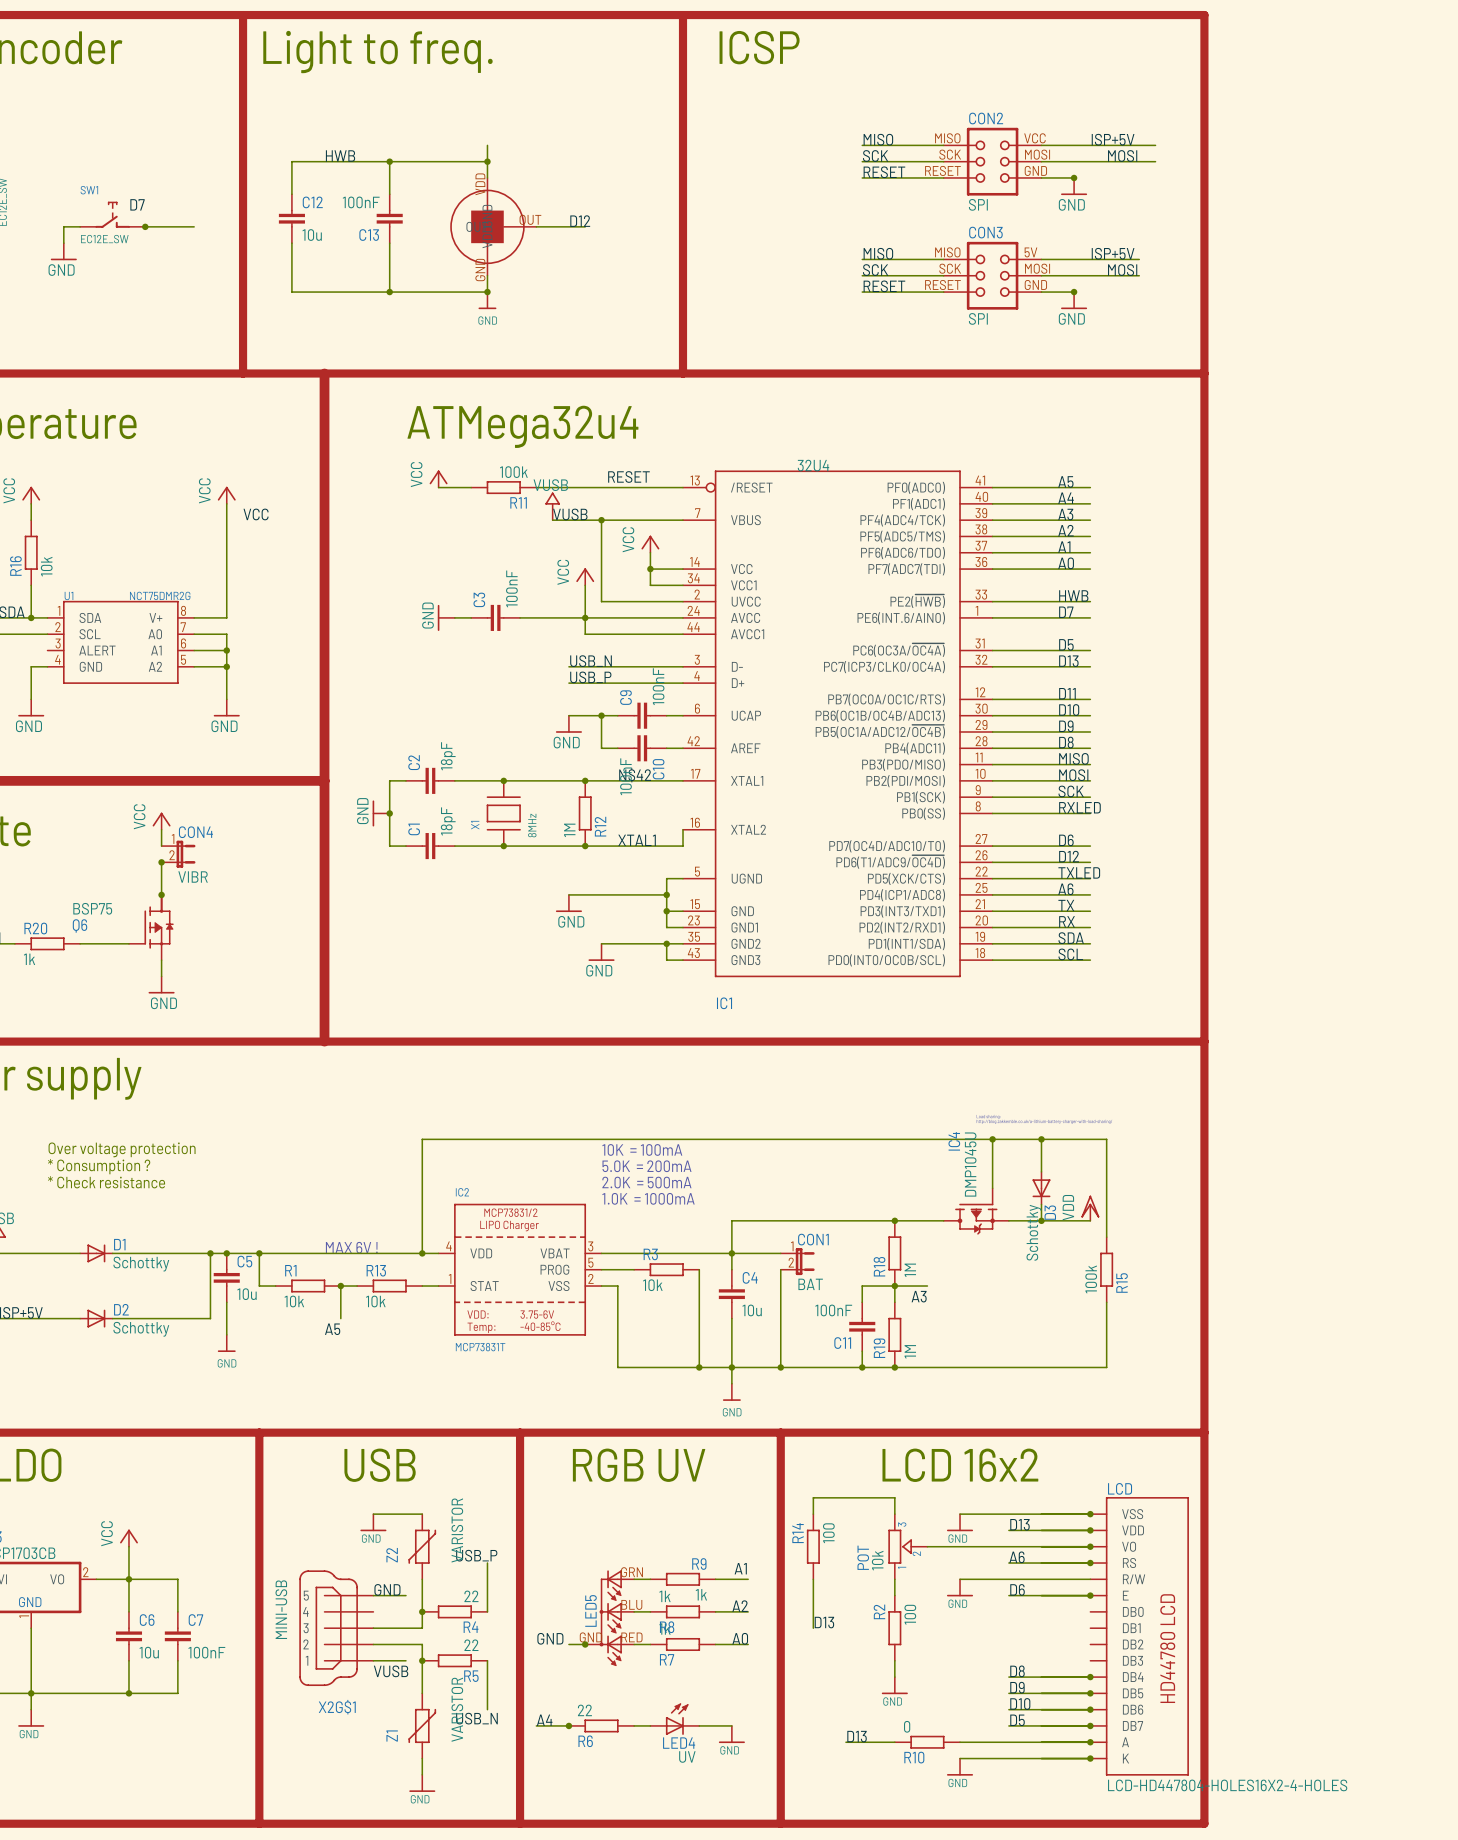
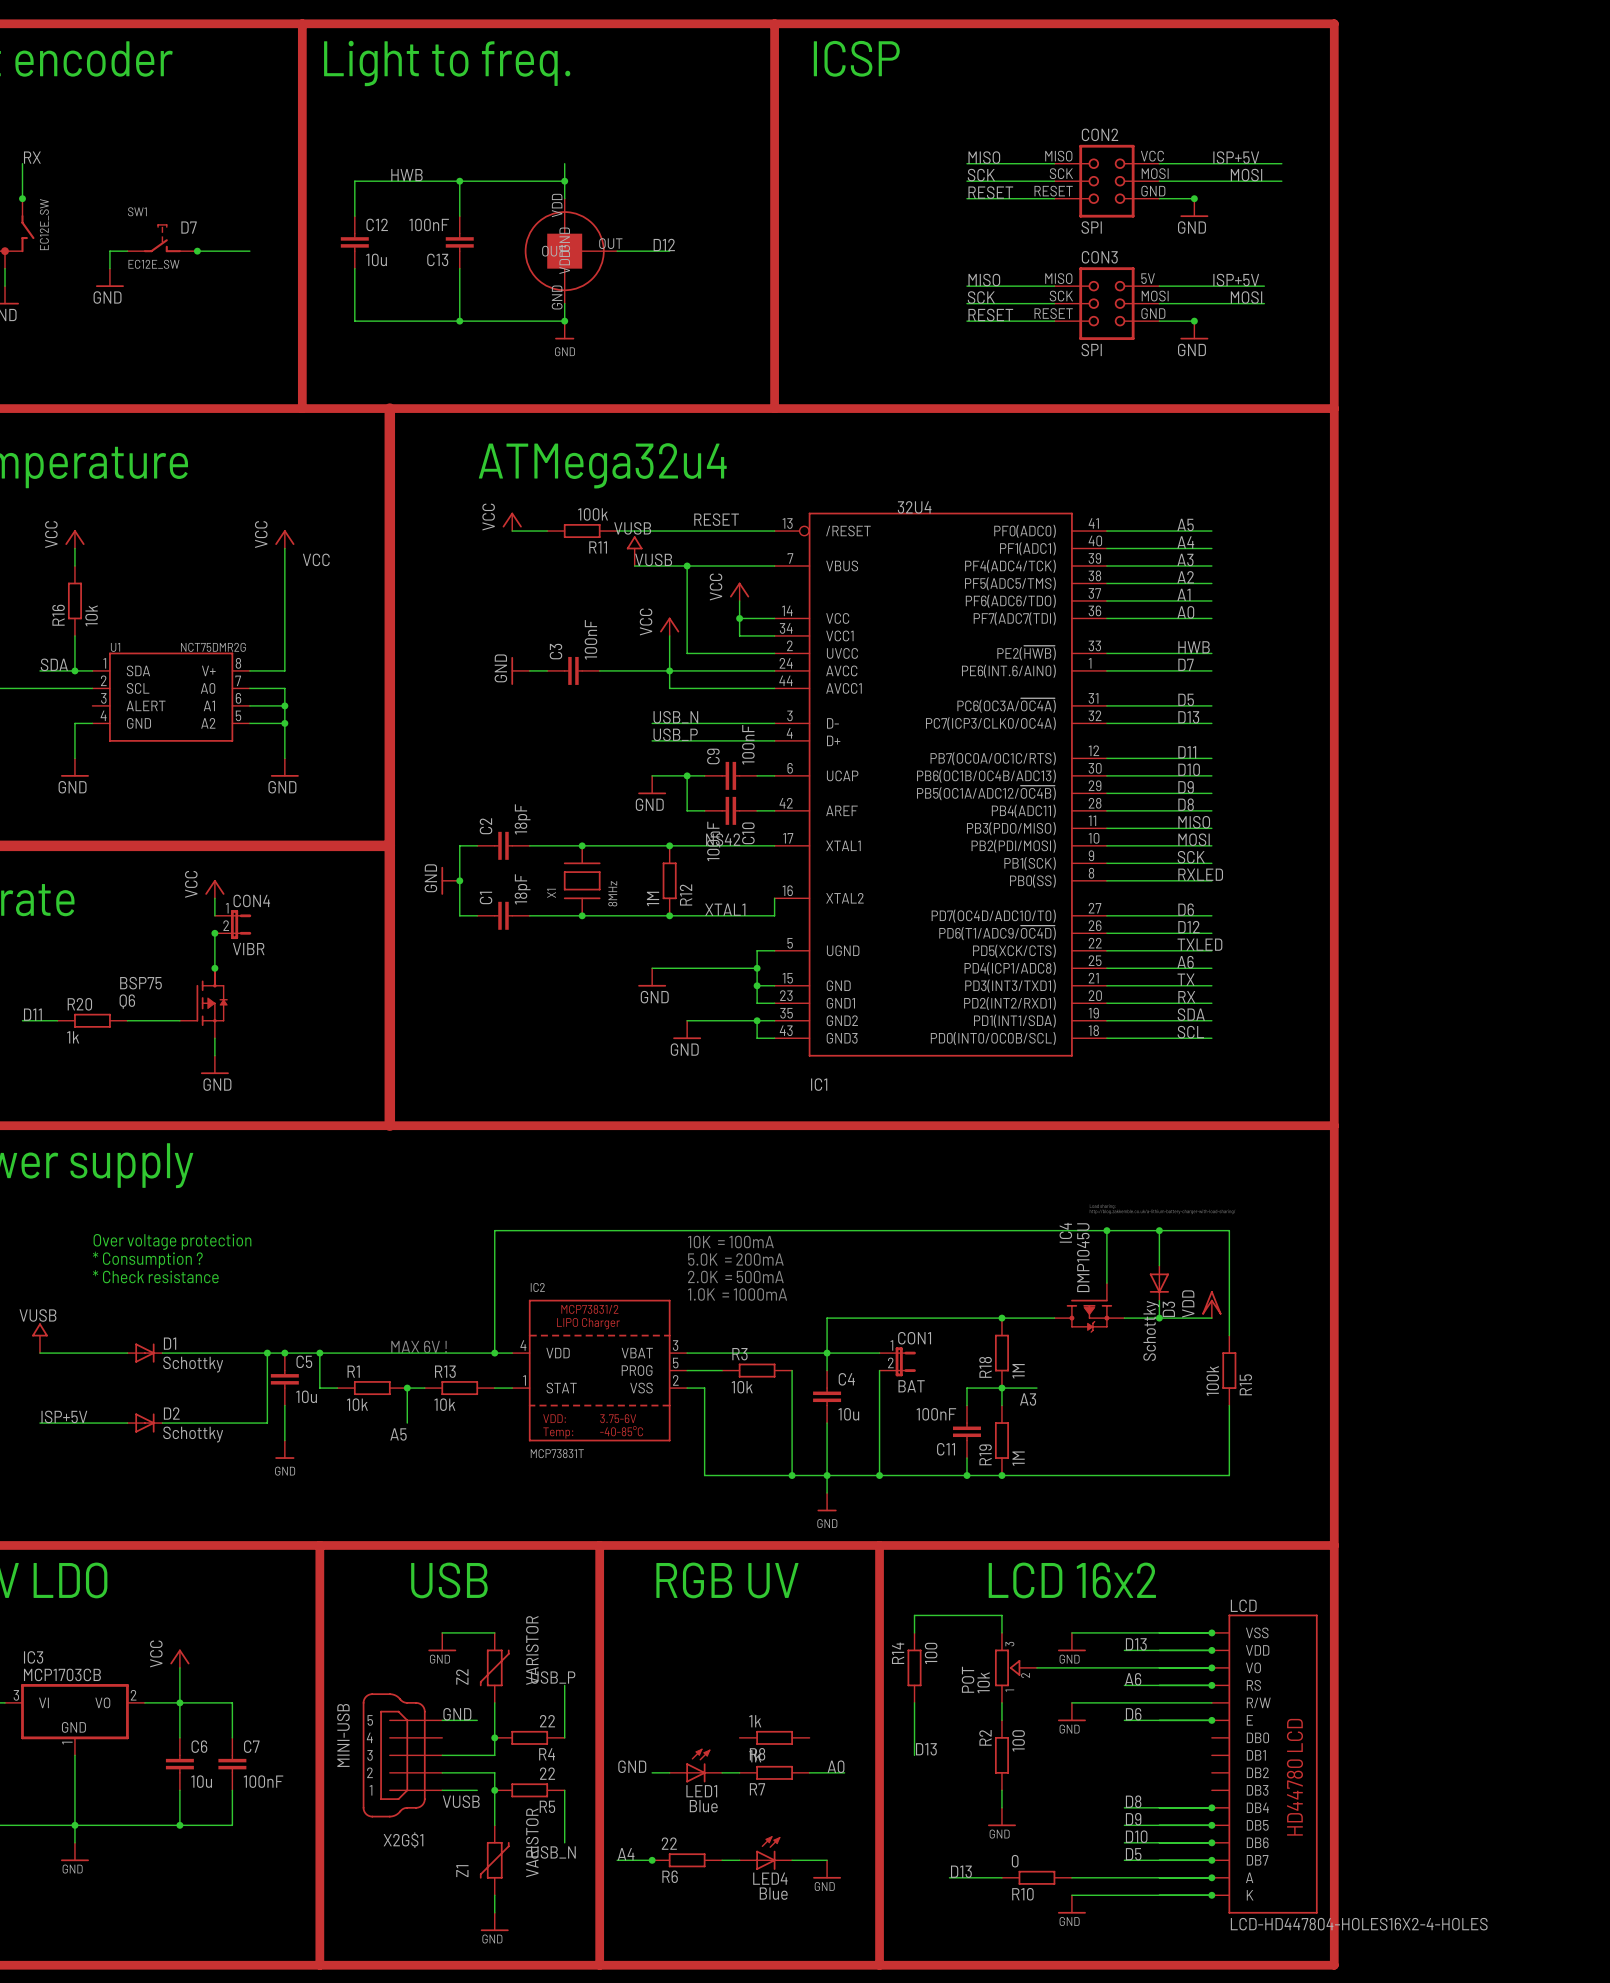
label: A1 (740, 1568) -> none
wire: (634, 1579) (650, 1579) -> none
R9: 1k (683, 1579) -> none
wire: (715, 1579) (748, 1579) -> none
label: A2 (740, 1606) -> none
wire: (634, 1611) (650, 1611) -> none
wire: (715, 1611) (748, 1611) -> none
LED5: (609, 1618) -> none
LED1: none -> Blue (695, 1765)
junction: (585, 1644) -> none
LED4 value: UV (687, 1756) -> Blue (773, 1893)

